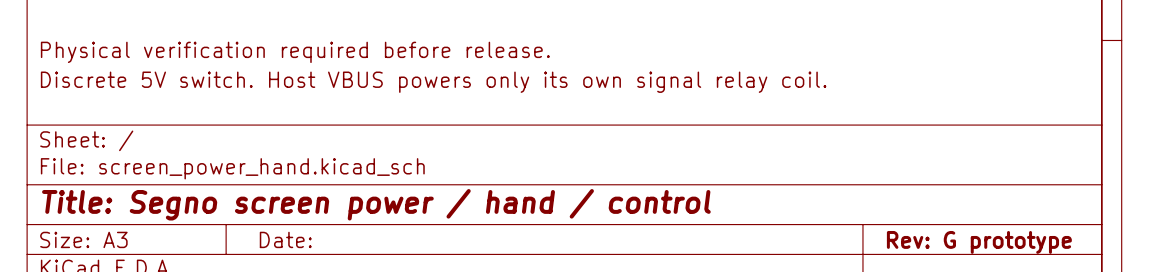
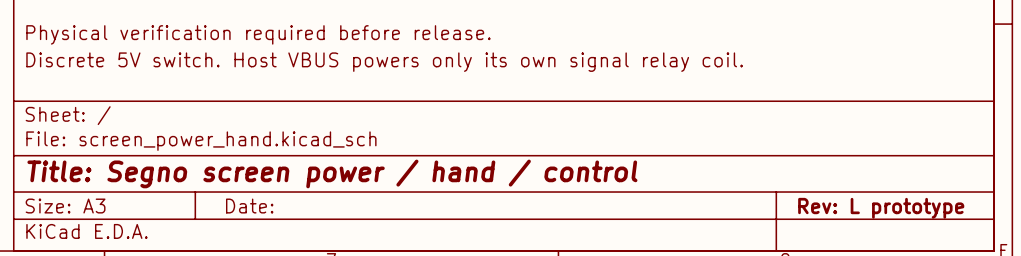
title block: Rev: G prototype (979, 242) -> Rev: L prototype (881, 208)

